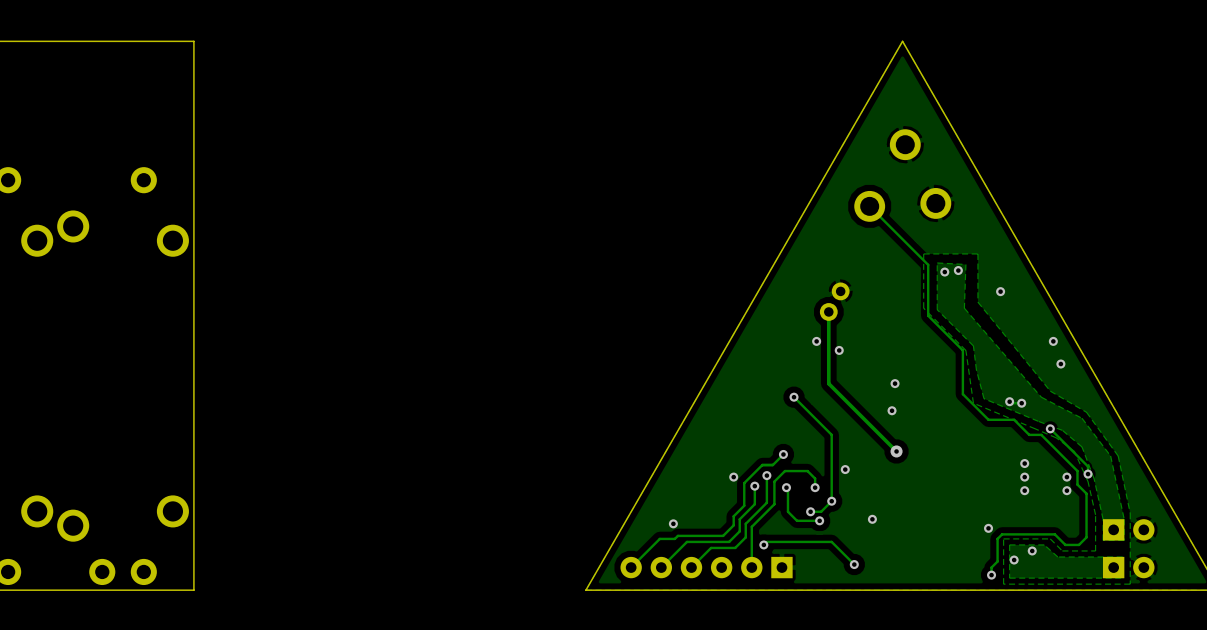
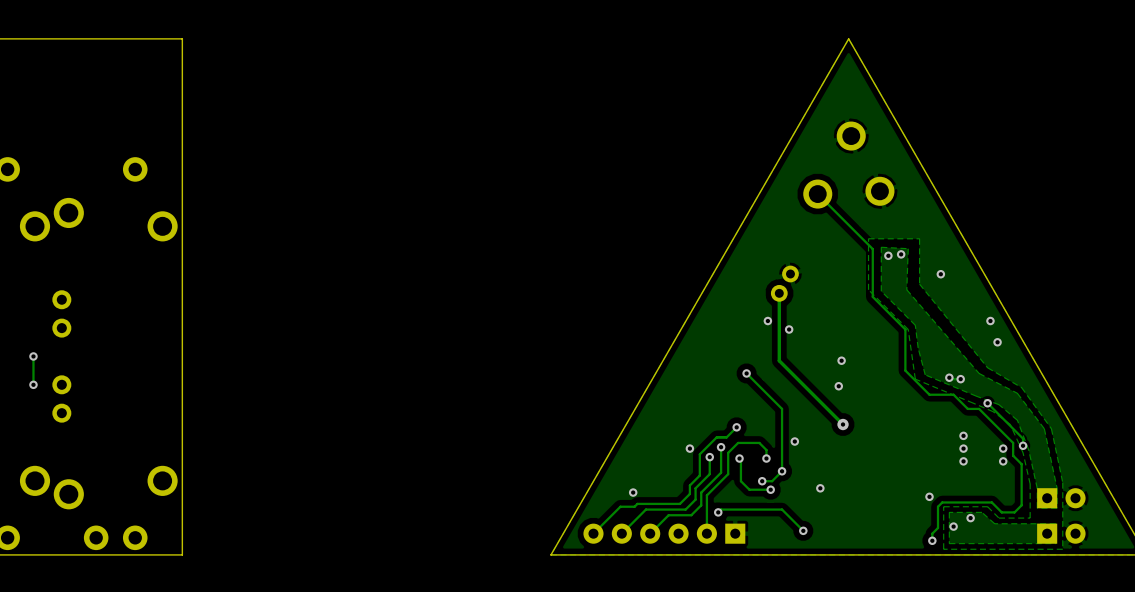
part: none -> (61, 299)
part: none -> (61, 328)
track: none -> (33, 356) (33, 384)
via: none -> (33, 356)
via: none -> (33, 384)
part: none -> (61, 384)
part: none -> (61, 413)

